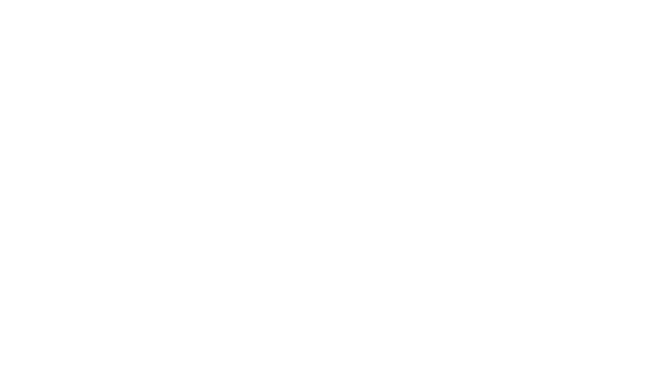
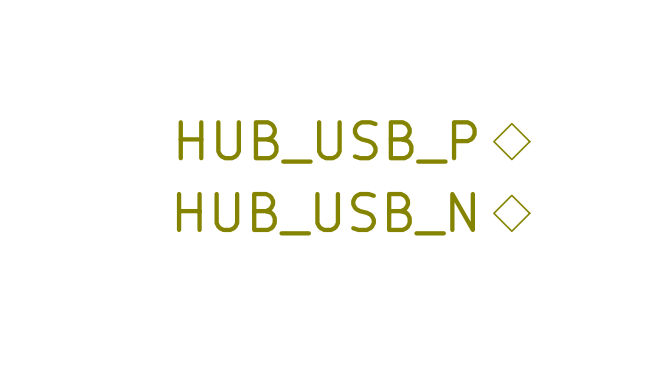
hierarchical label: none -> HUB_USB_P (327, 141)
hierarchical label: none -> HUB_USB_N (325, 213)

